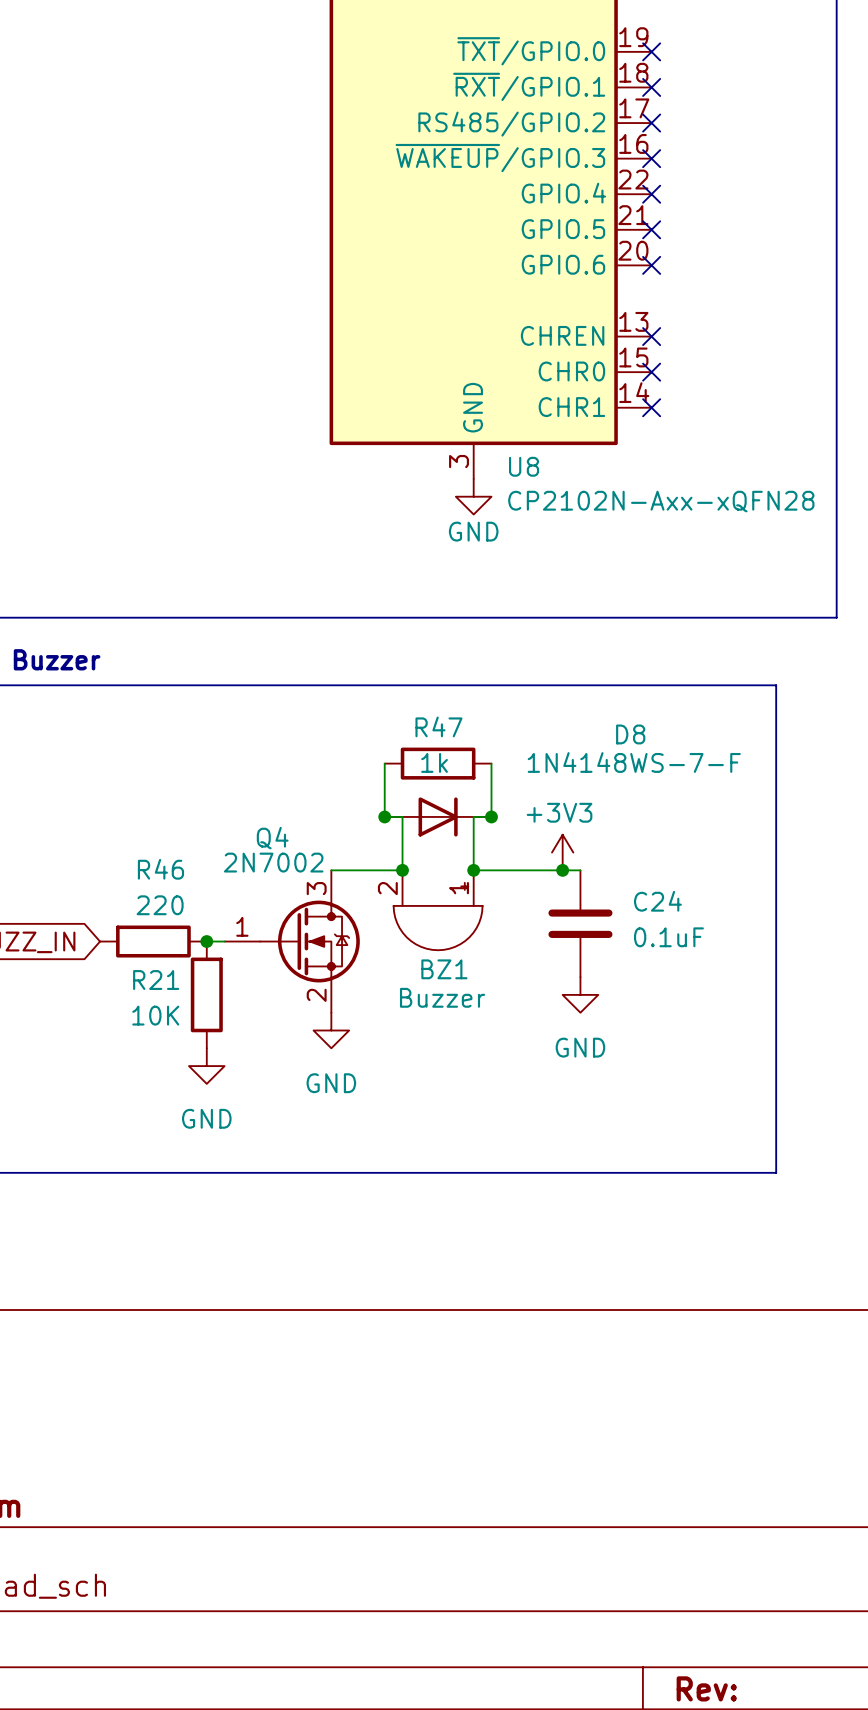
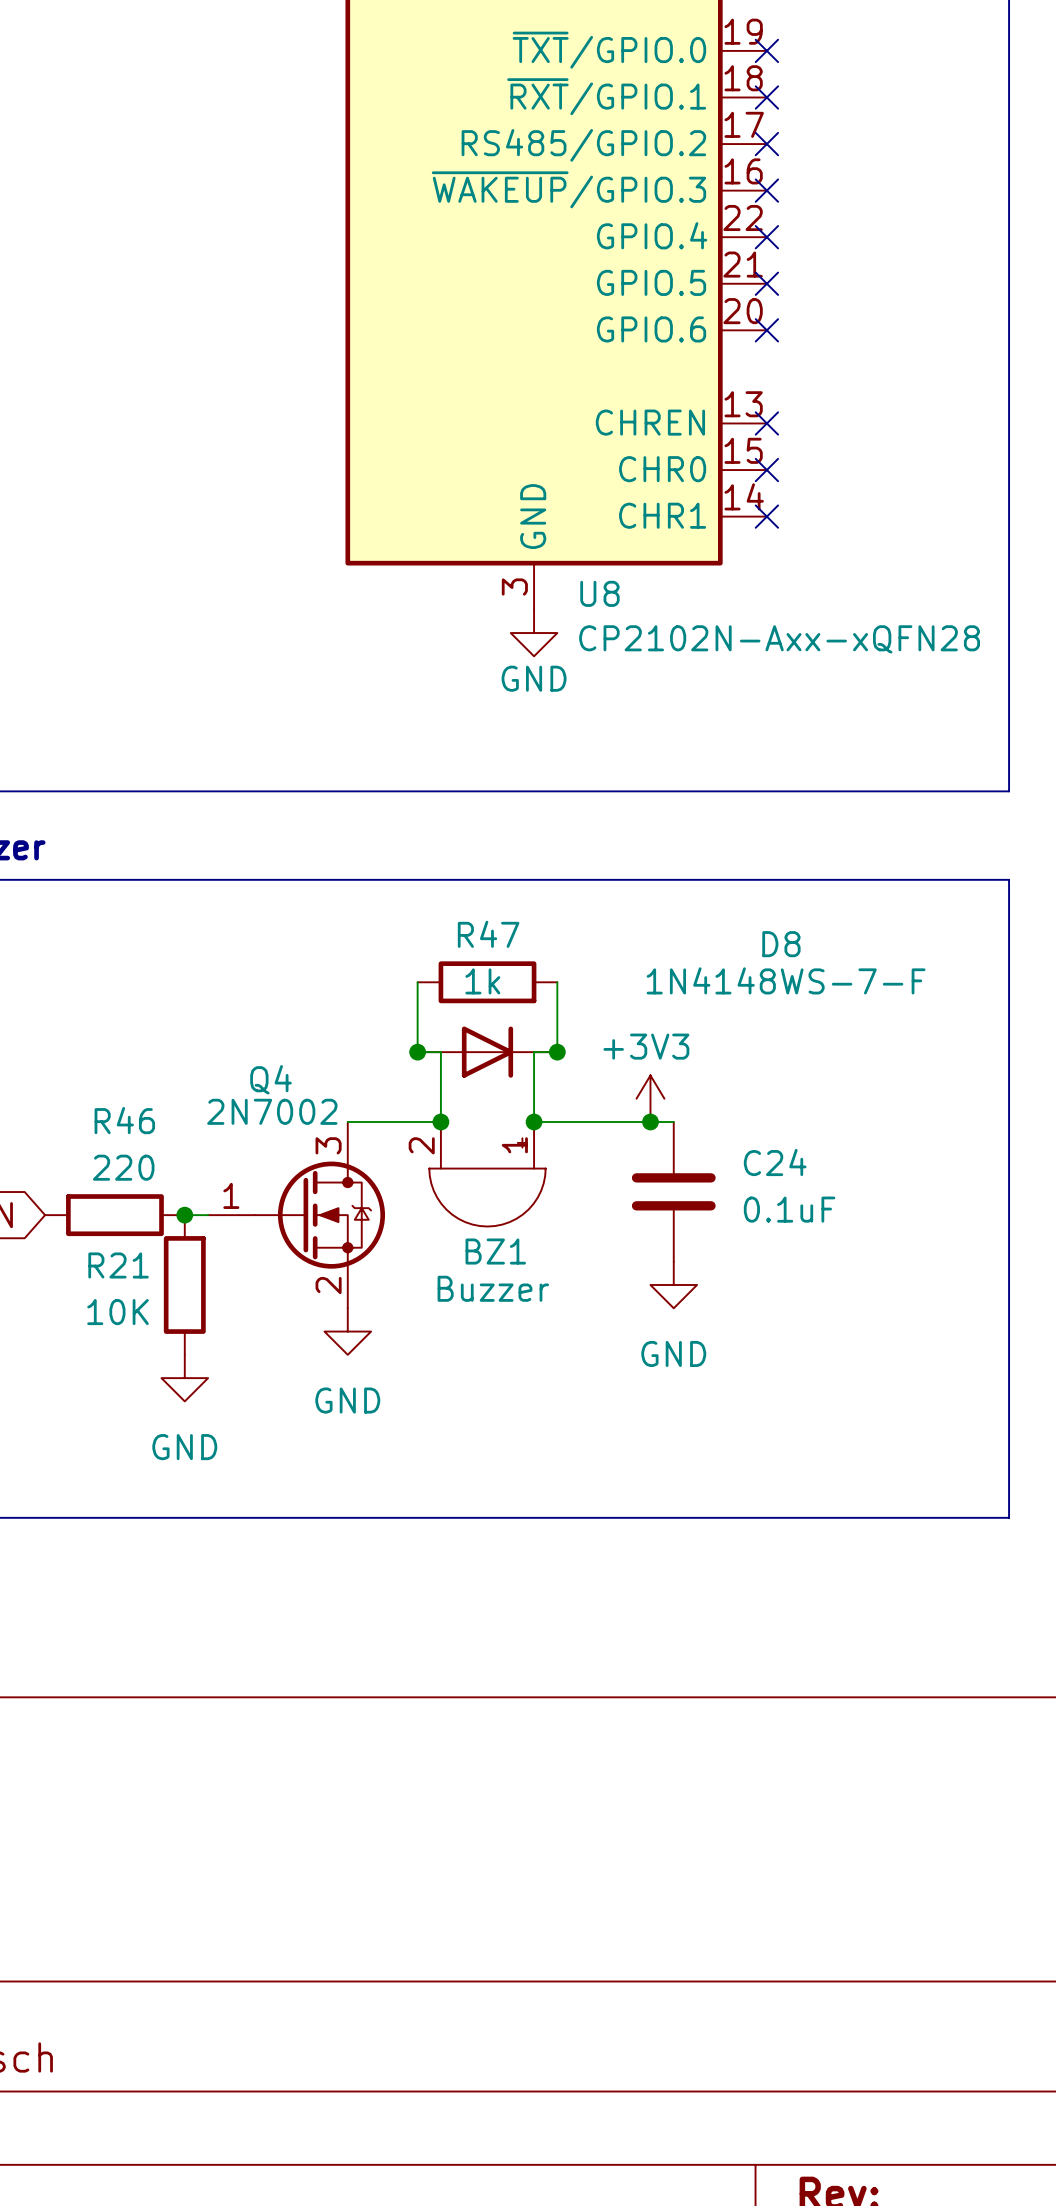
line: (776, 685) (776, 1172) -> (929, 879) (1009, 879) (1009, 1517) (929, 1517)
D8 name position: D8 (630, 734) -> D8 (781, 944)
D8 value position: 1N4148WS-7-F (634, 762) -> 1N4148WS-7-F (786, 980)

